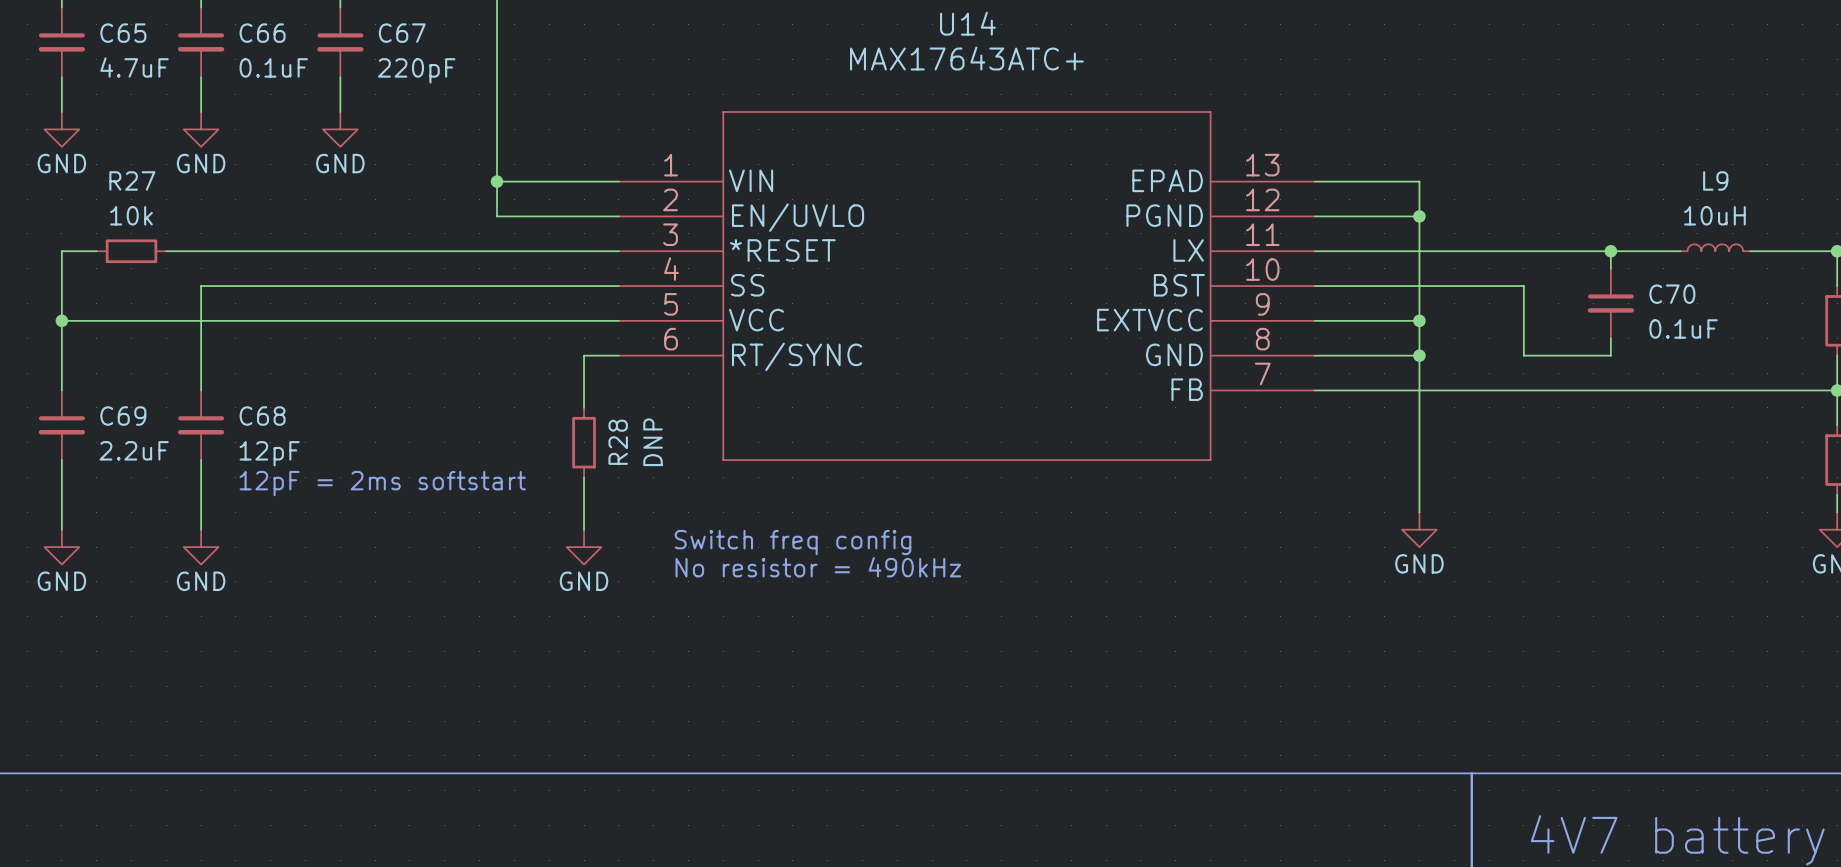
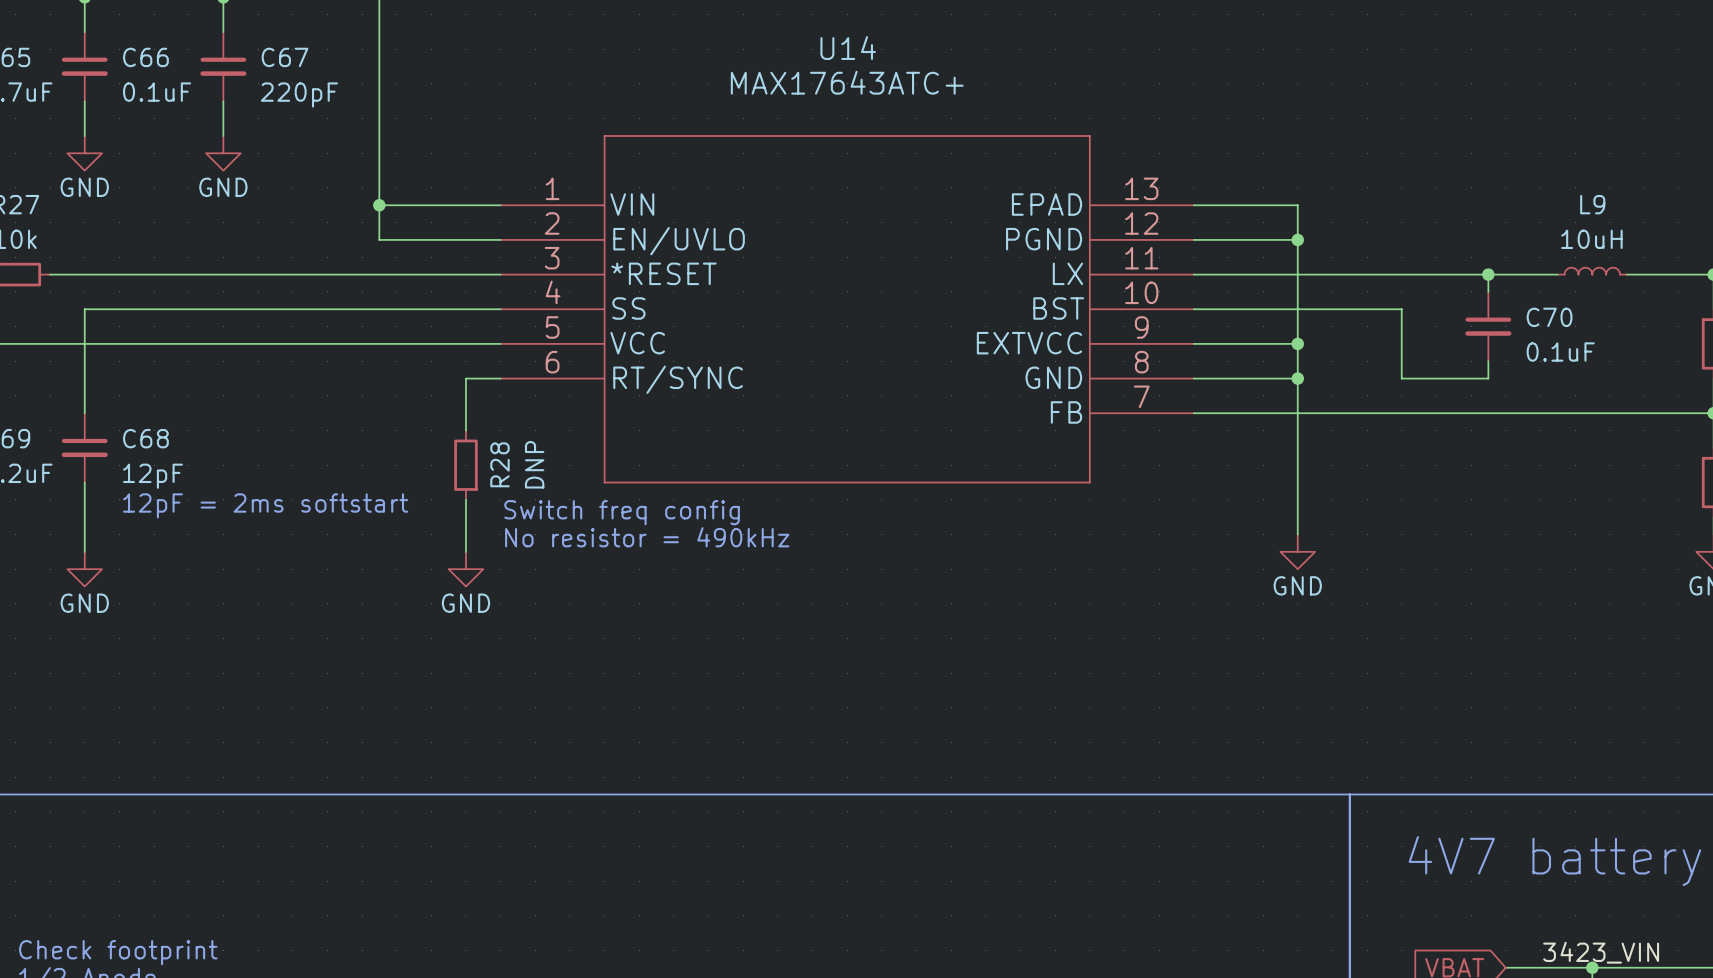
text position: Switch freq config (793, 542) -> Switch freq config (622, 512)
text position: No resistor = 490kHz (818, 567) -> No resistor = 490kHz (647, 537)

